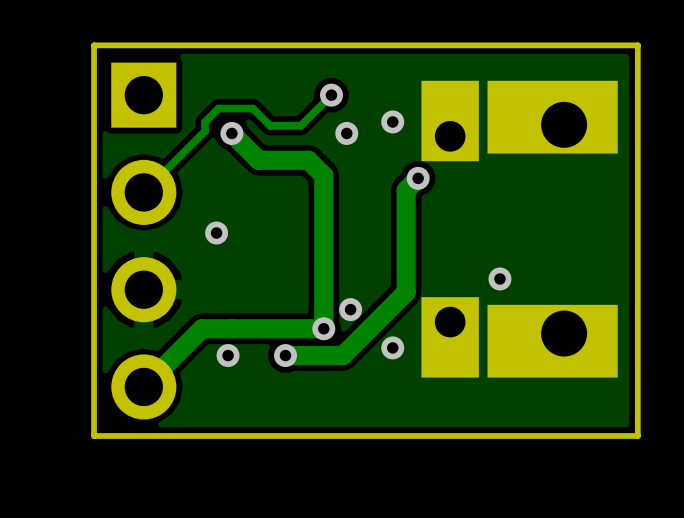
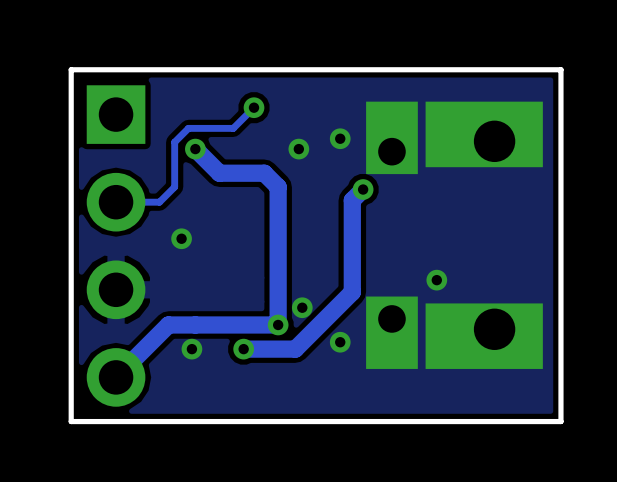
track: (331, 95) (300, 125) (270, 125) (252, 108) (218, 108) (205, 121) (205, 131) (143, 192) -> (254, 107) (233, 128) (188, 128) (174, 142) (174, 187) (159, 202) (116, 202)
via position: (331, 95) -> (254, 107)

